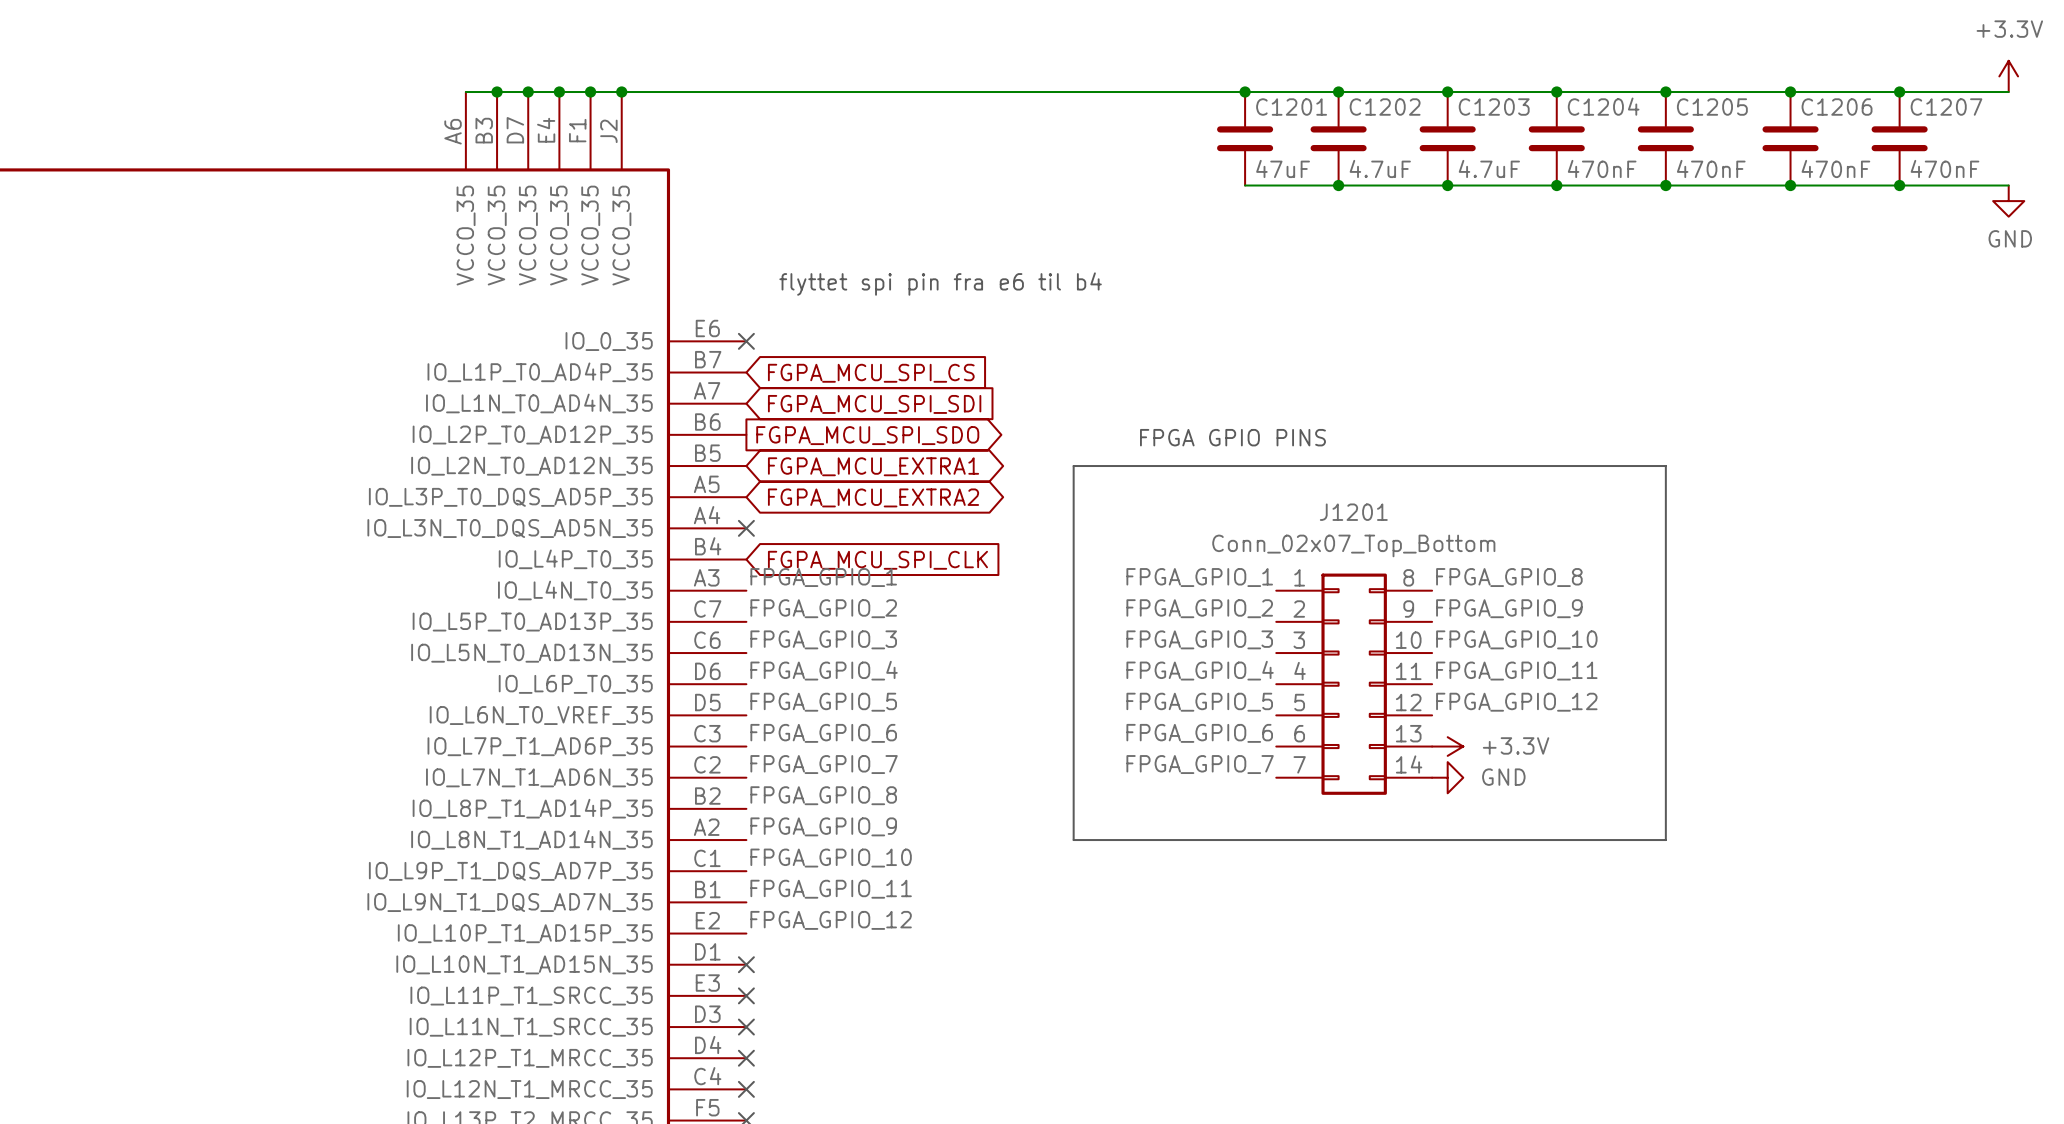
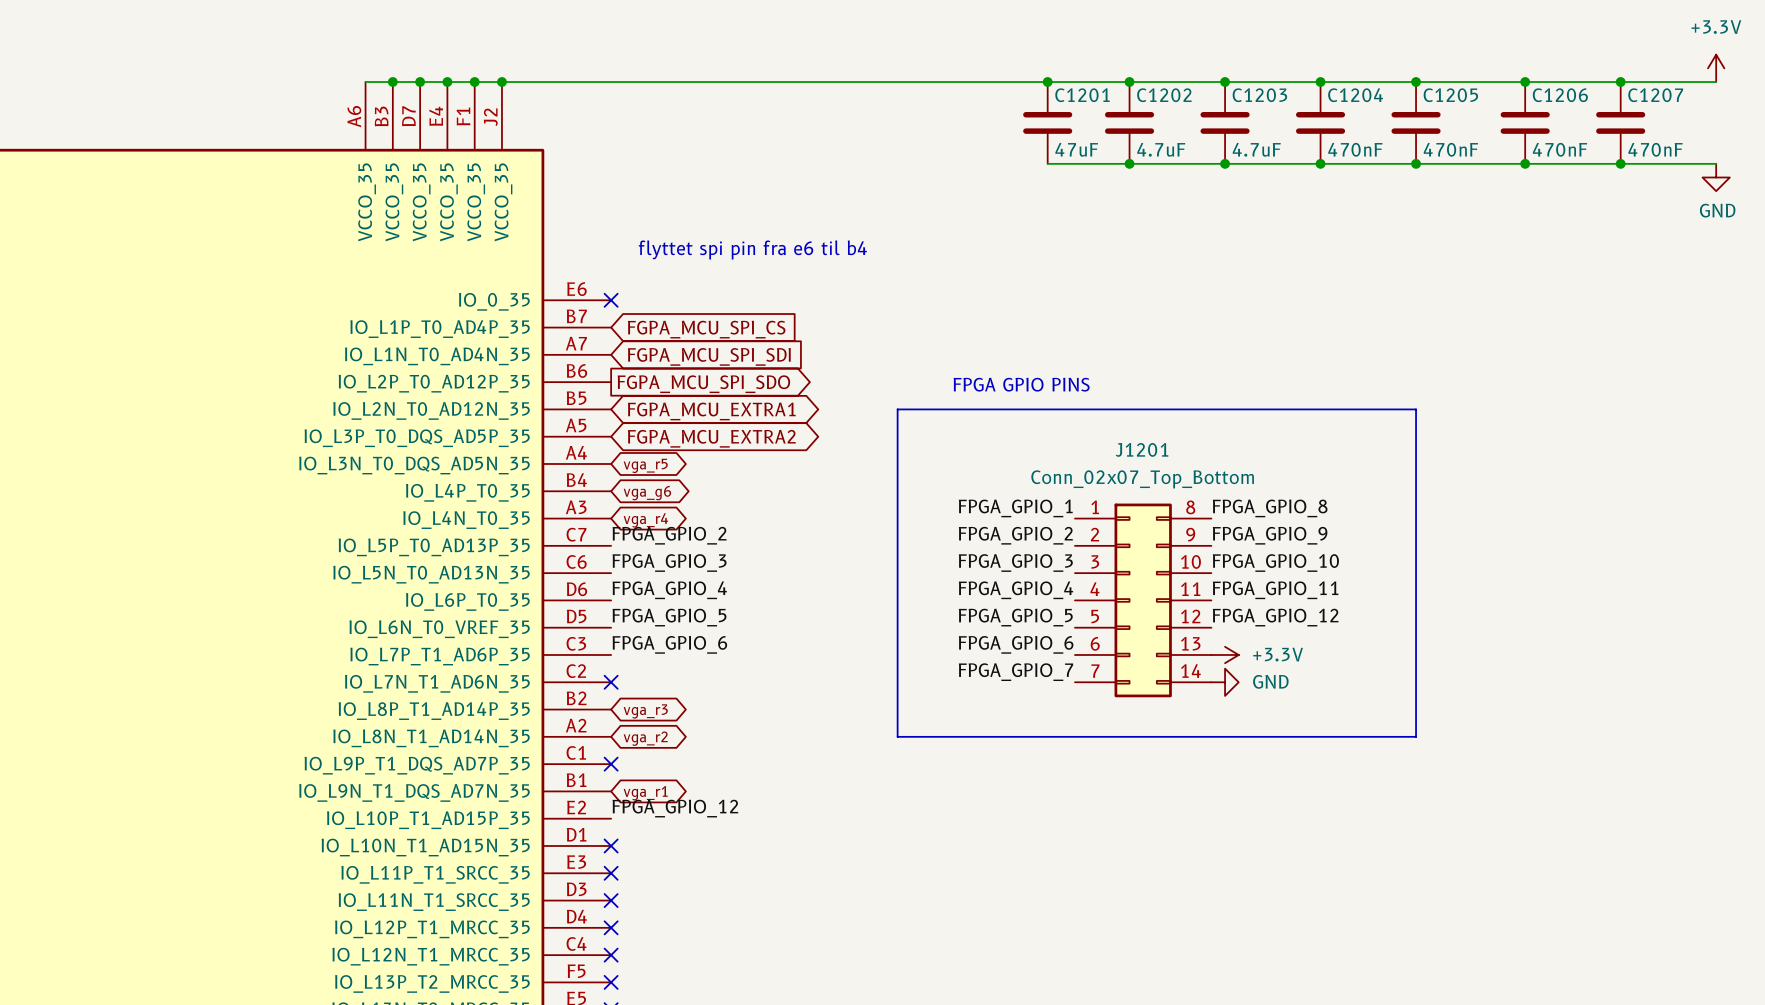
no-connect mark: (746, 528) -> none
global label: none -> vga_r5 (645, 465)
global label shape: input (877, 560) -> bidirectional (647, 493)
global label: FGPA_MCU_SPI_CLK (877, 560) -> vga_g6 (647, 493)
label: FPGA_GPIO_1 (823, 577) -> none
global label: none -> vga_r4 (645, 520)
label: FPGA_GPIO_7 (824, 764) -> none
no-connect mark: none -> (611, 682)
label: FPGA_GPIO_8 (823, 795) -> none
global label: none -> vga_r3 (645, 711)
label: FPGA_GPIO_9 (823, 826) -> none
global label: none -> vga_r2 (645, 738)
label: FPGA_GPIO_10 (831, 858) -> none
no-connect mark: none -> (611, 764)
label: FPGA_GPIO_11 (831, 889) -> none
global label: none -> vga_r1 (645, 793)

